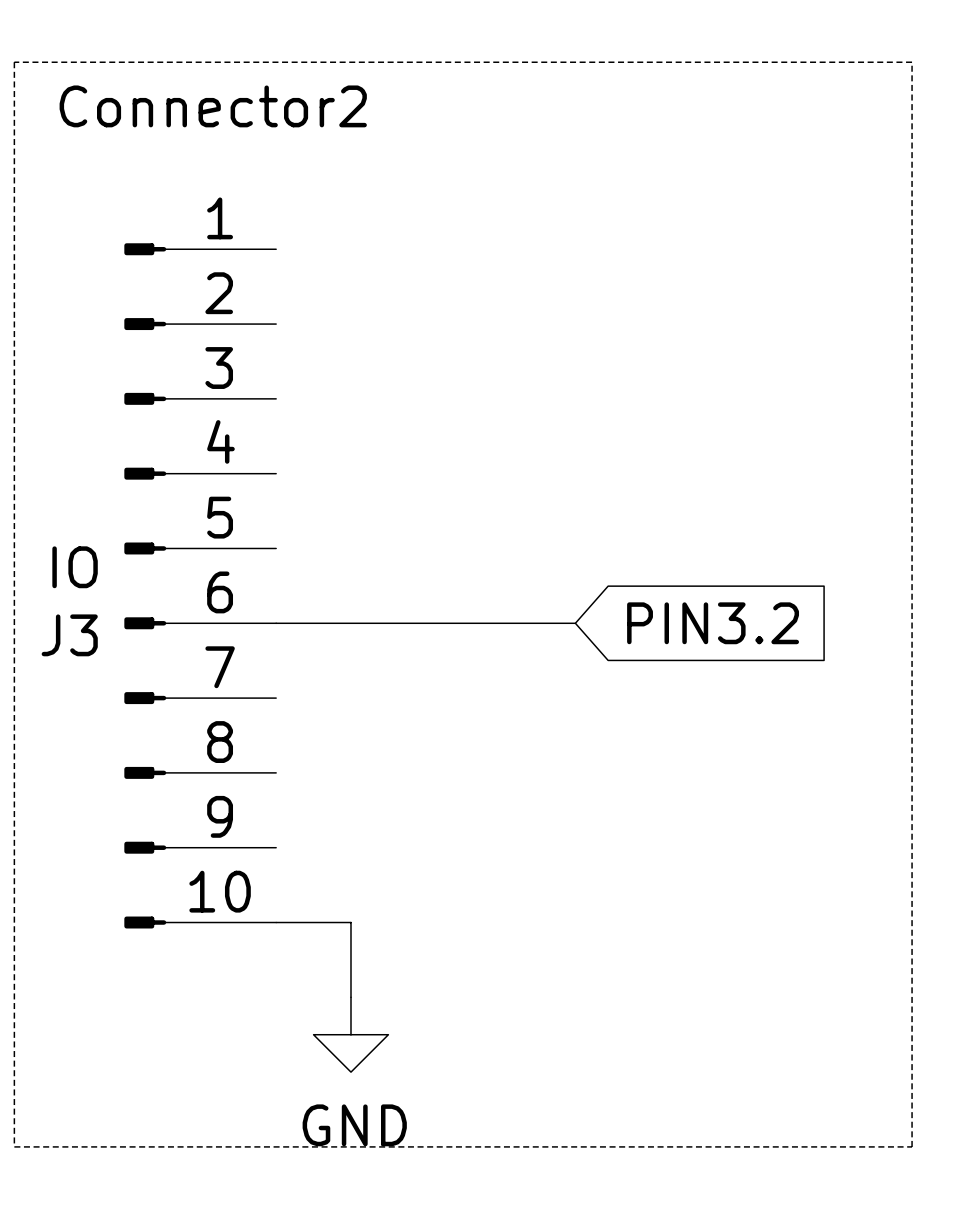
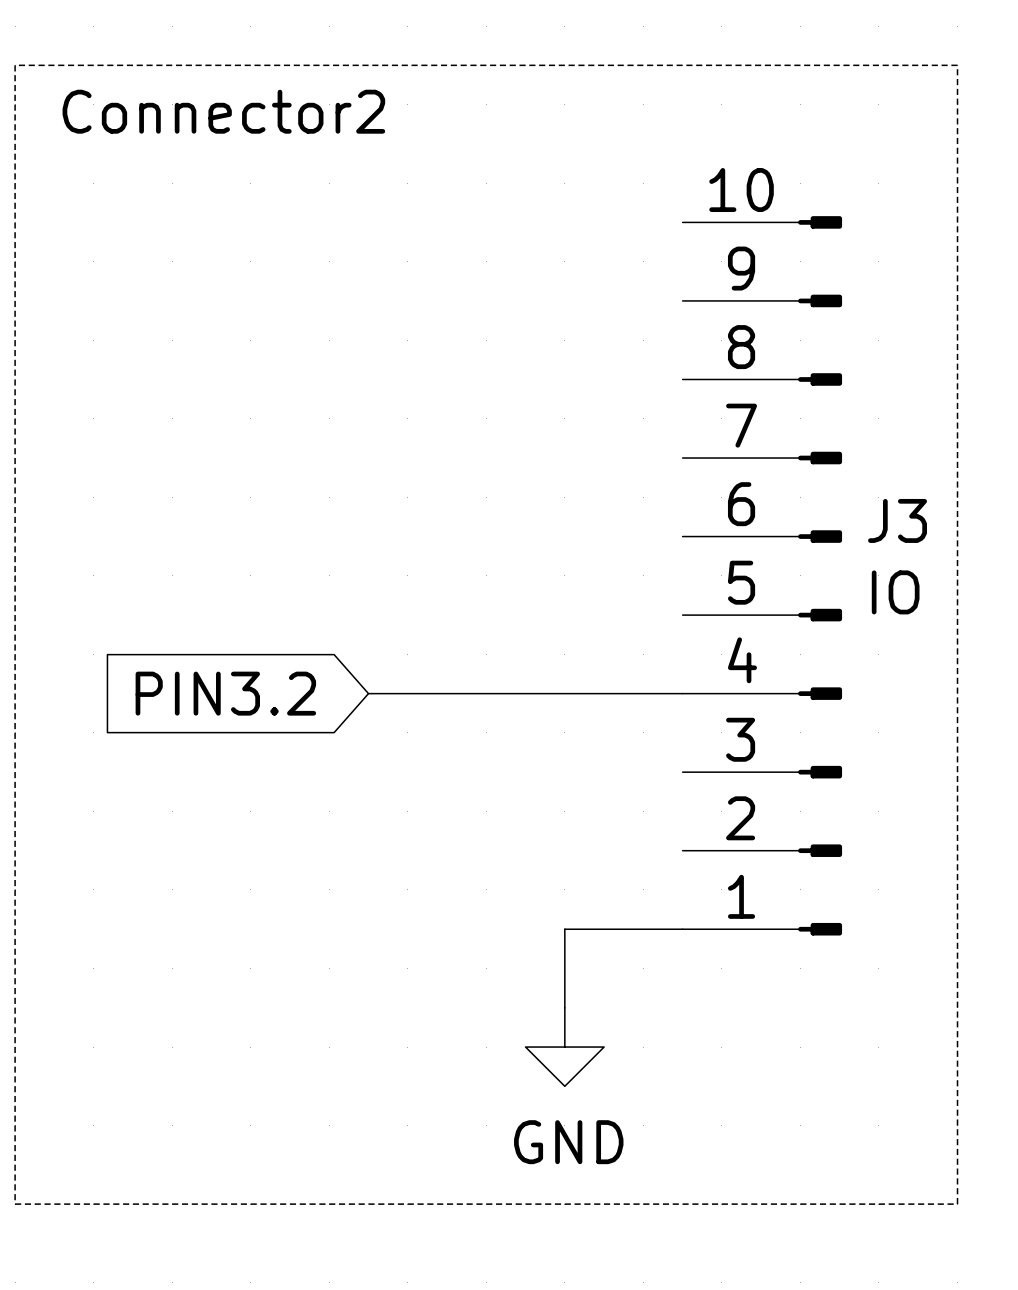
J3 rotation: 0° (145, 585) -> 180° (820, 575)
J3 position: (200, 585) -> (762, 575)
wire: (276, 623) (575, 623) -> (368, 693) (682, 693)
global label rotation: 0° (713, 623) -> 180° (225, 693)
global label position: PIN3.2 (713, 623) -> PIN3.2 (225, 693)
wire: none -> (682, 929) (564, 929) (564, 1007)
wire: (276, 922) (350, 922) (350, 997) -> none
power symbol position: GND (350, 1034) -> GND (564, 1047)

